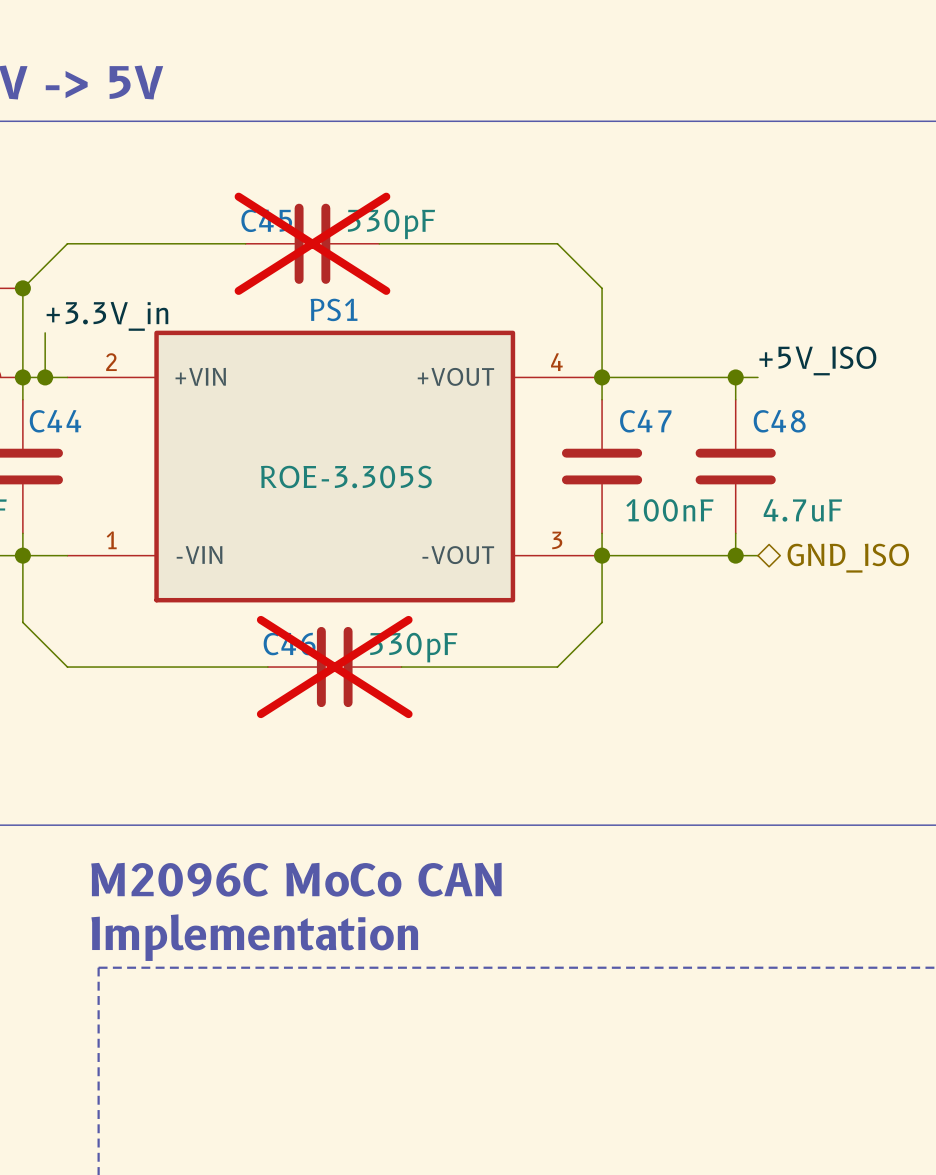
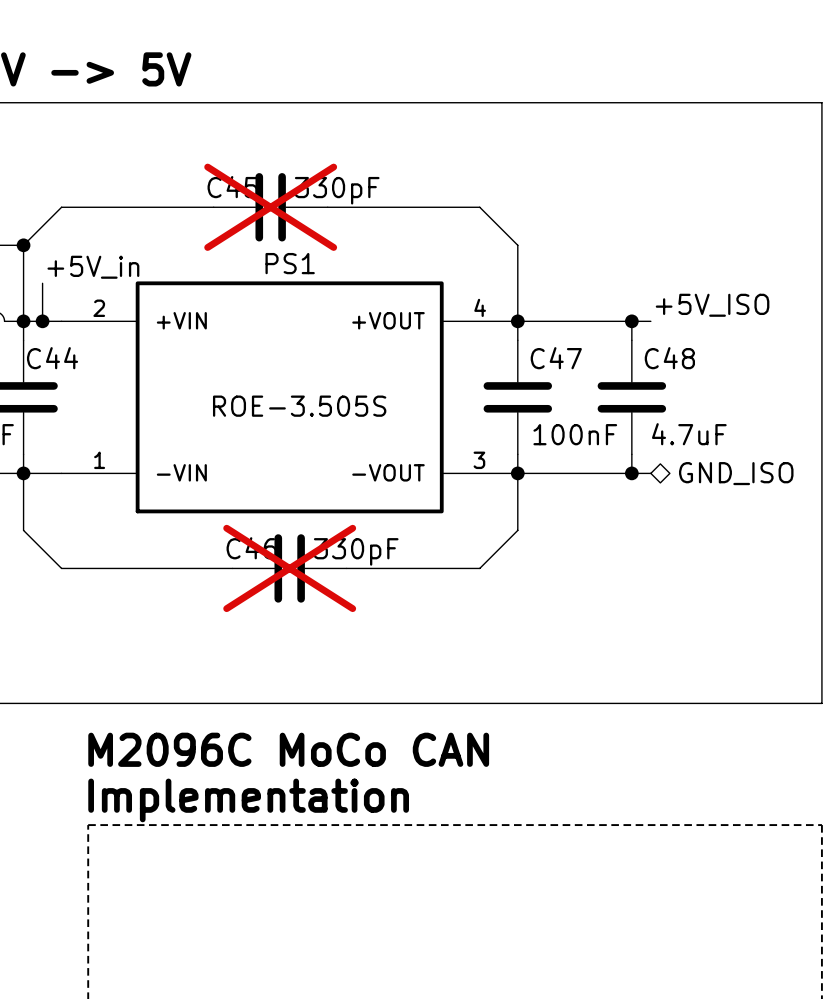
label: +3.3V_in (107, 316) -> +5V_in (93, 267)
PS1 value: ROE-3.305S (346, 476) -> ROE-3.505S (299, 406)

